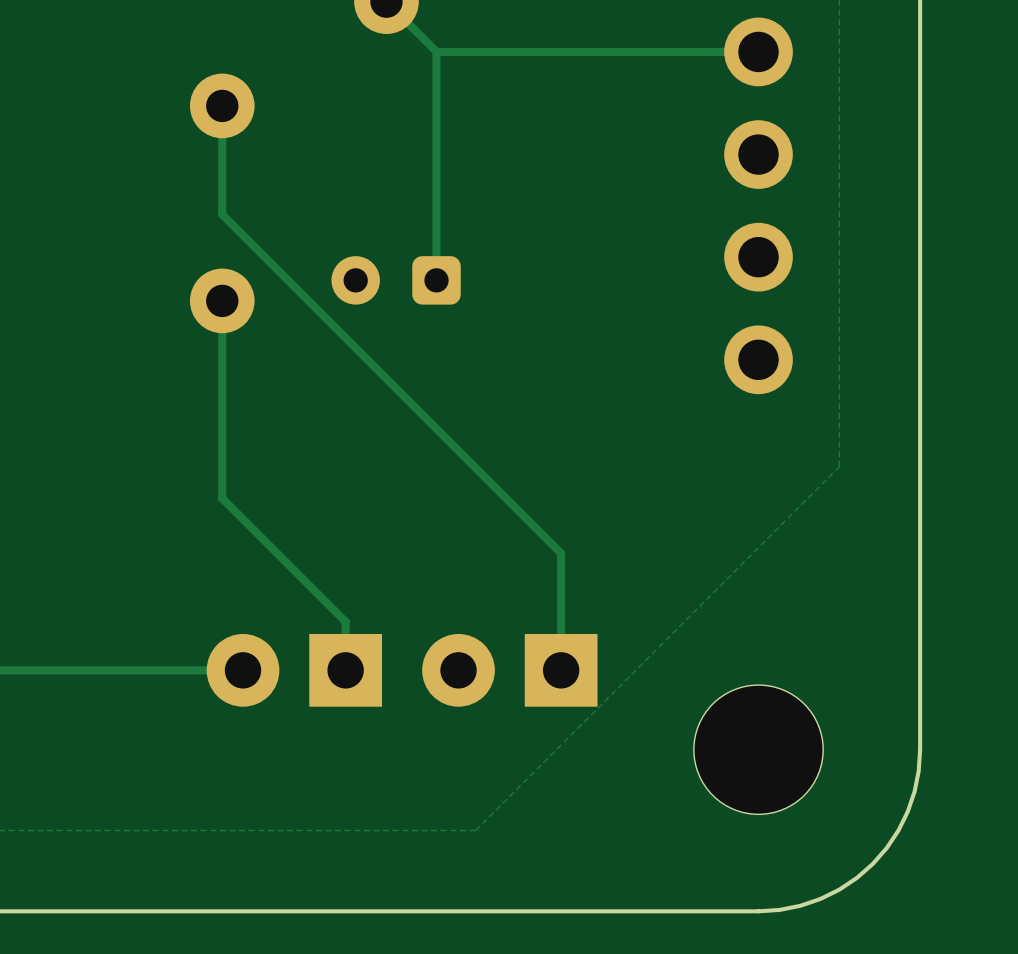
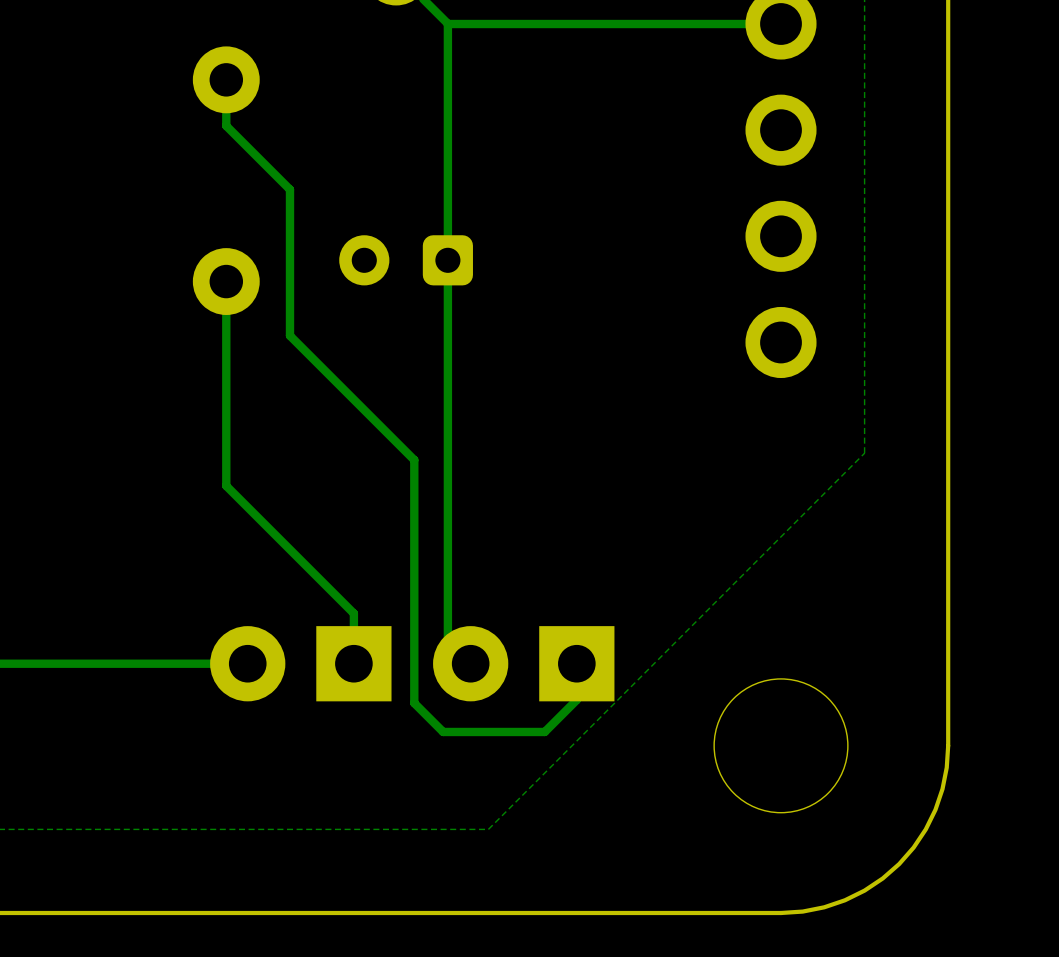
track: (222, 150) (222, 214) (561, 553) (561, 670) -> (226, 125) (289, 189) (289, 335) (414, 460) (414, 703) (443, 731) (544, 731) (576, 699) (576, 663)
track: none -> (447, 260) (447, 640) (470, 663)

